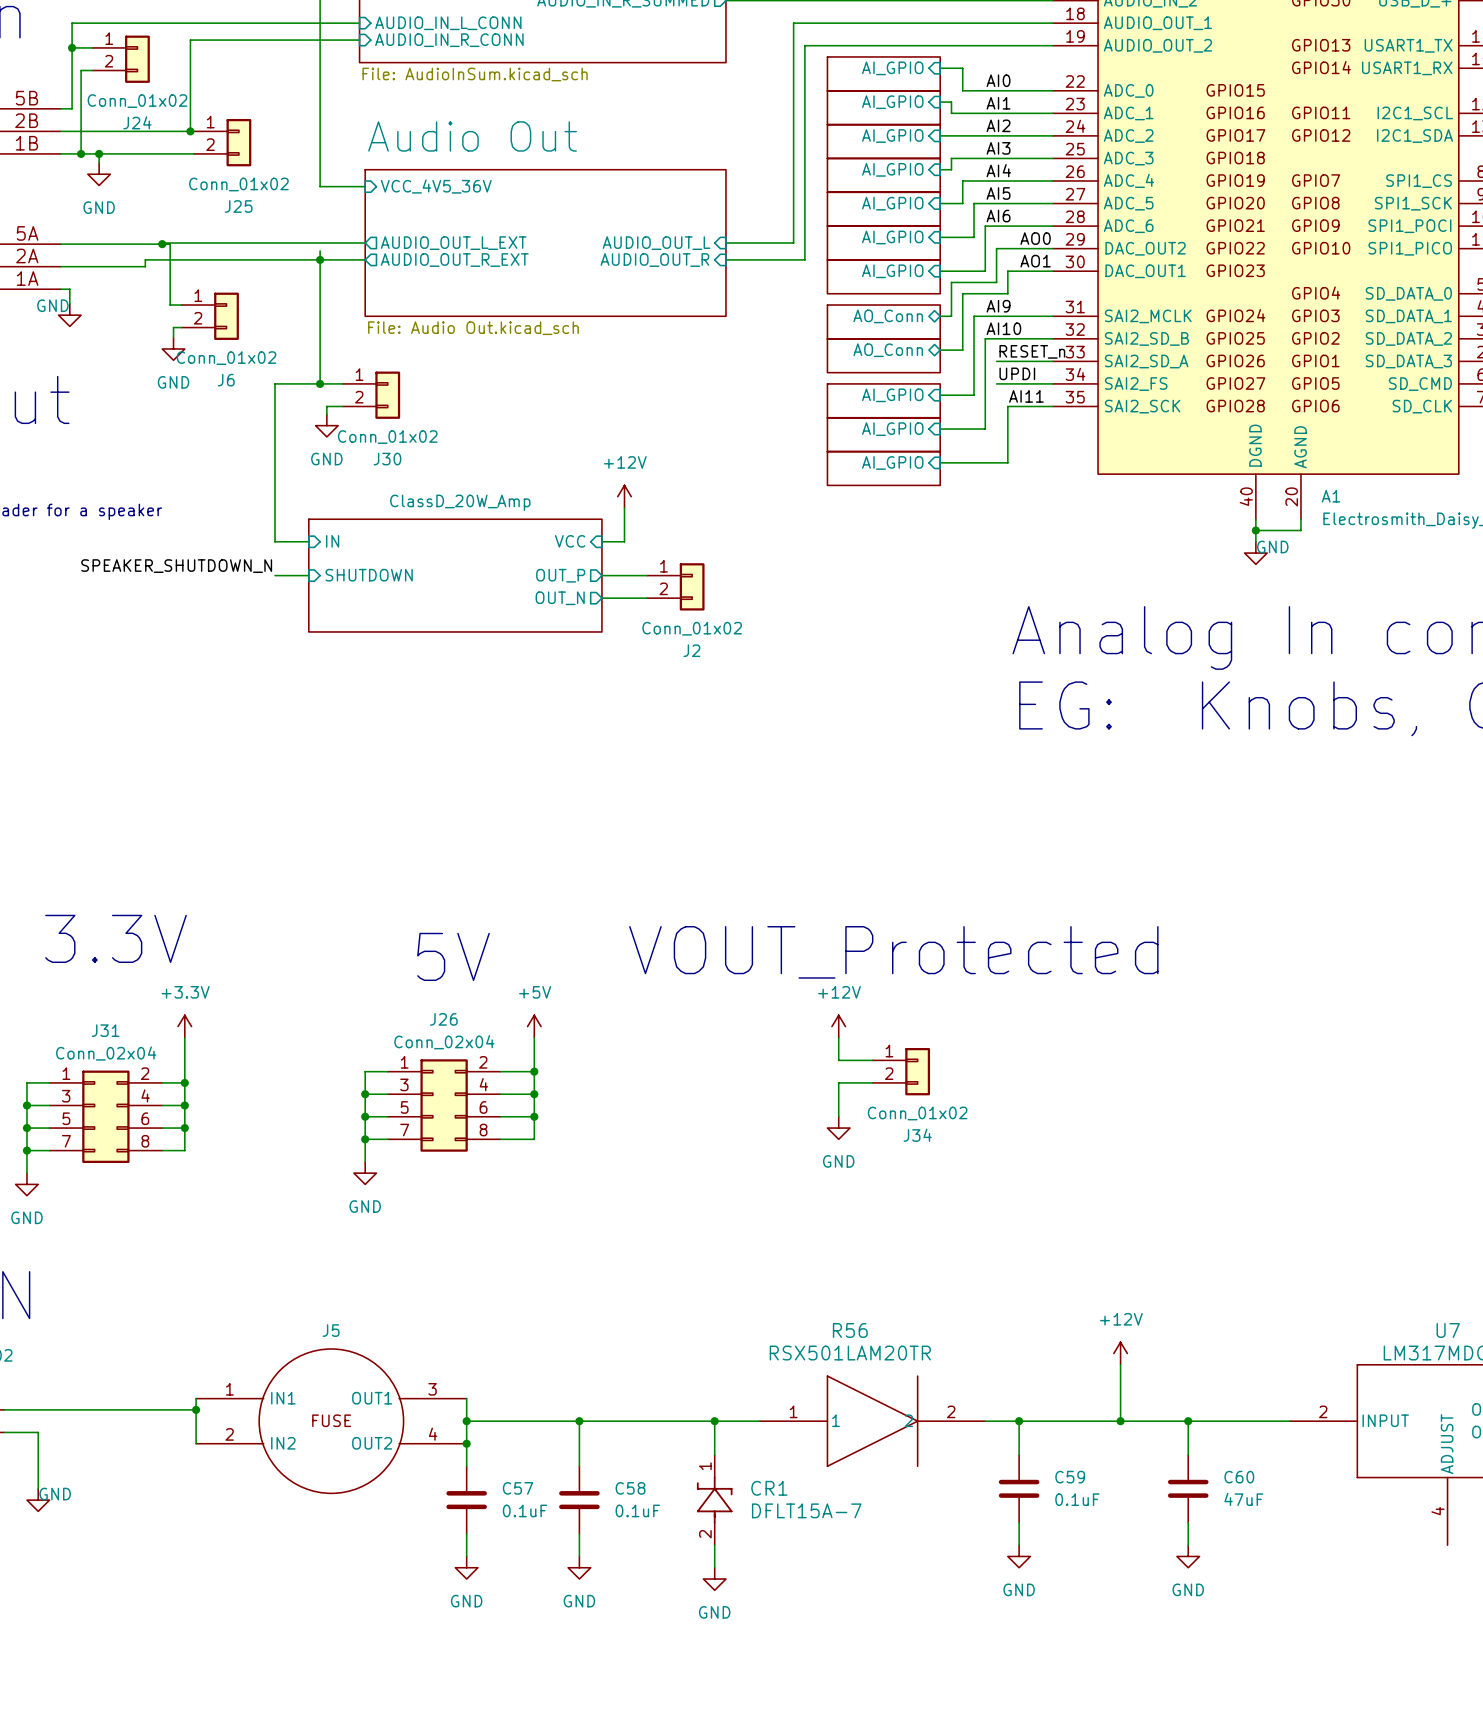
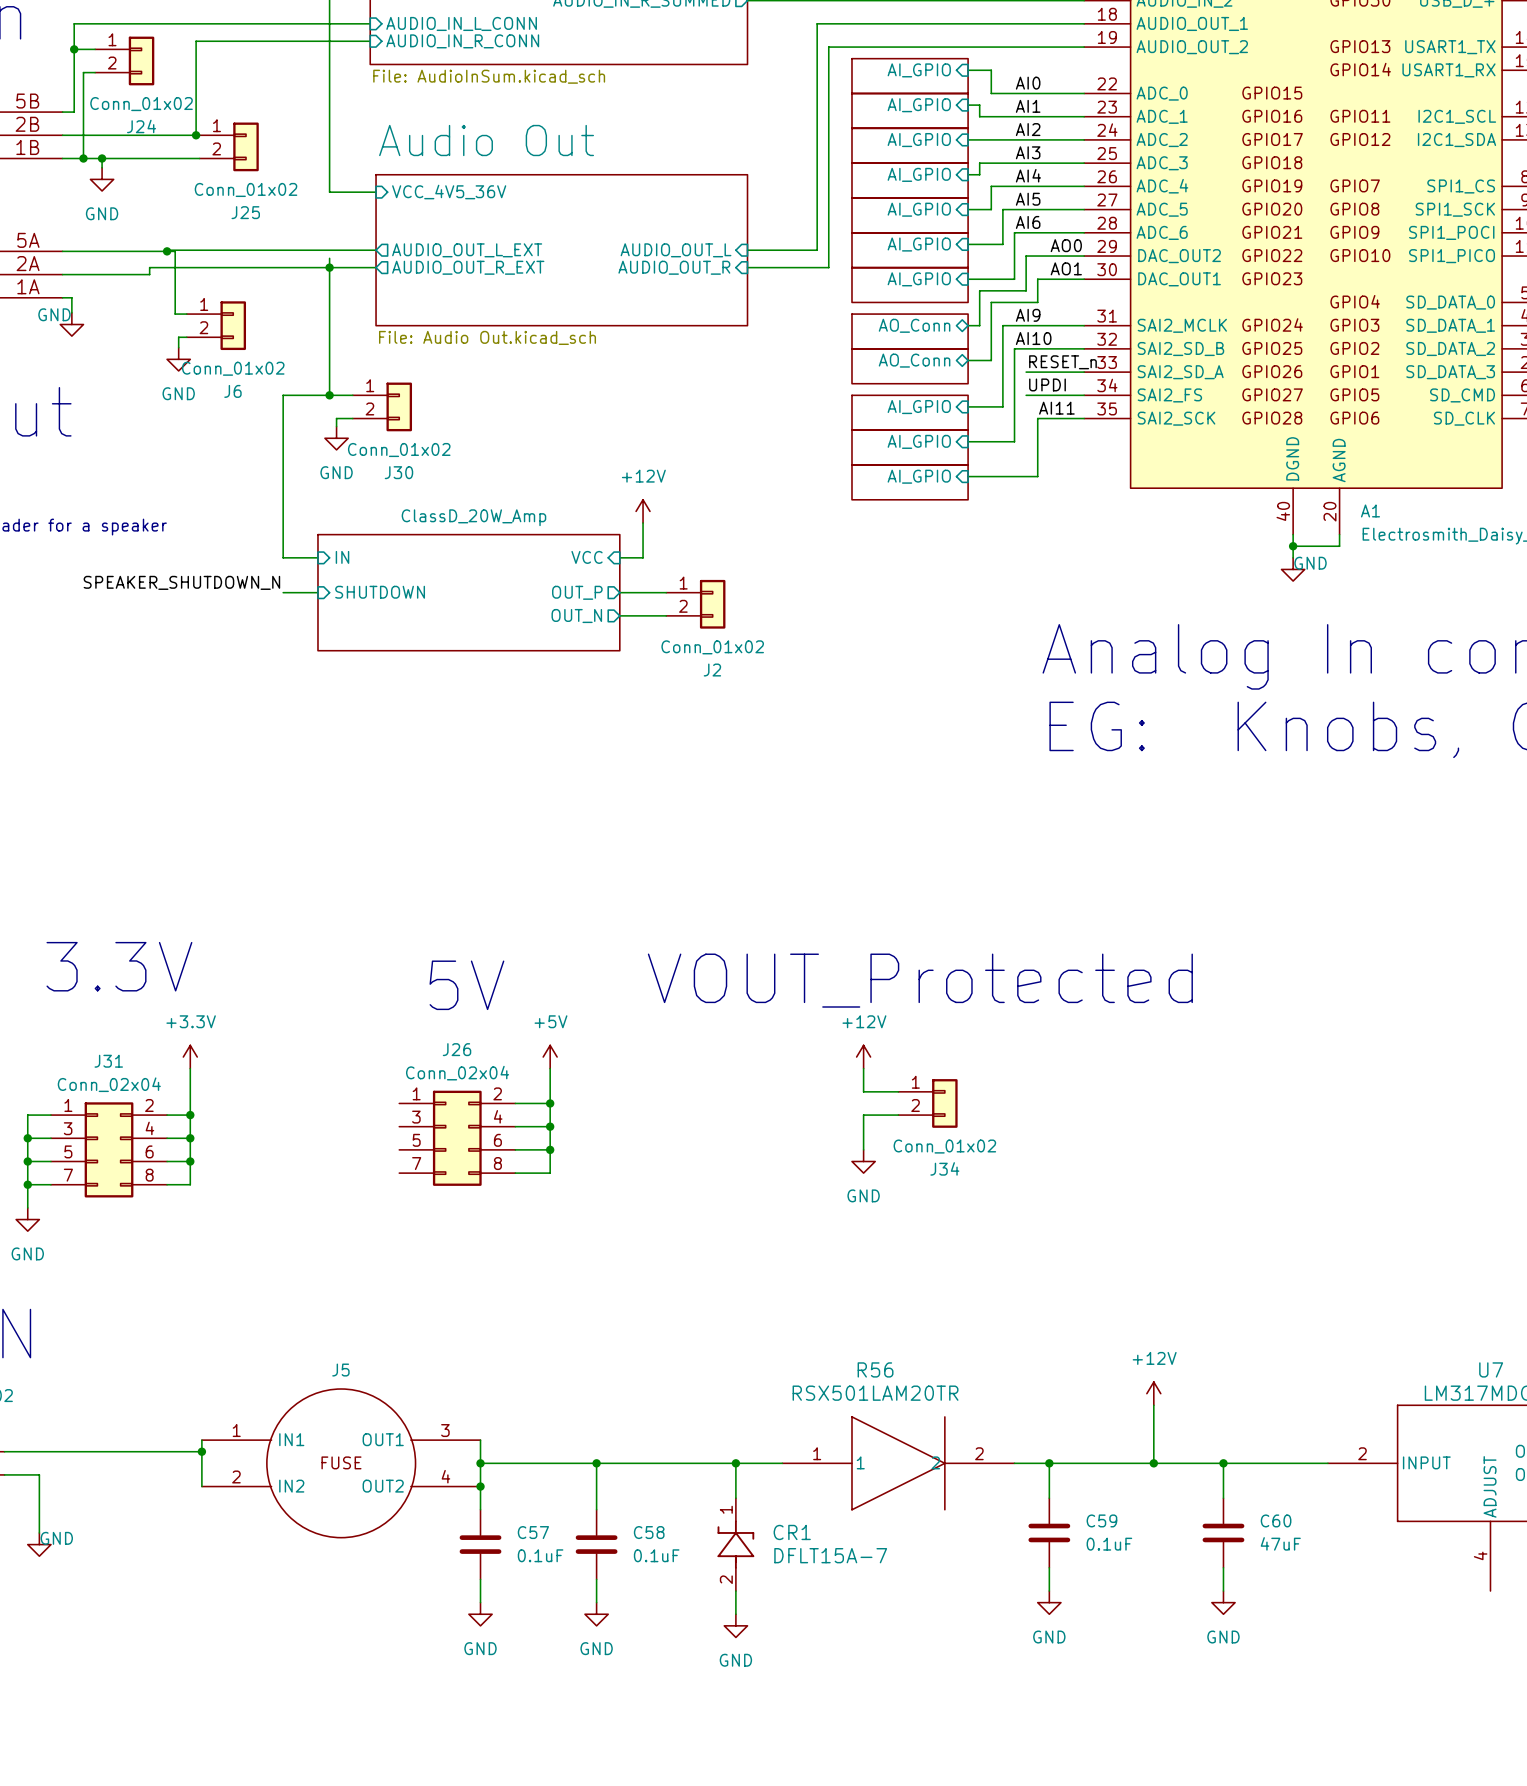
wire: (387, 1071) (365, 1071) (365, 1161) -> none
wire: (365, 1094) (387, 1094) -> none
junction: (365, 1094) -> none
wire: (365, 1116) (387, 1116) -> none
junction: (365, 1116) -> none
wire: (365, 1139) (387, 1139) -> none
junction: (365, 1139) -> none
power symbol: GND (365, 1173) -> none

